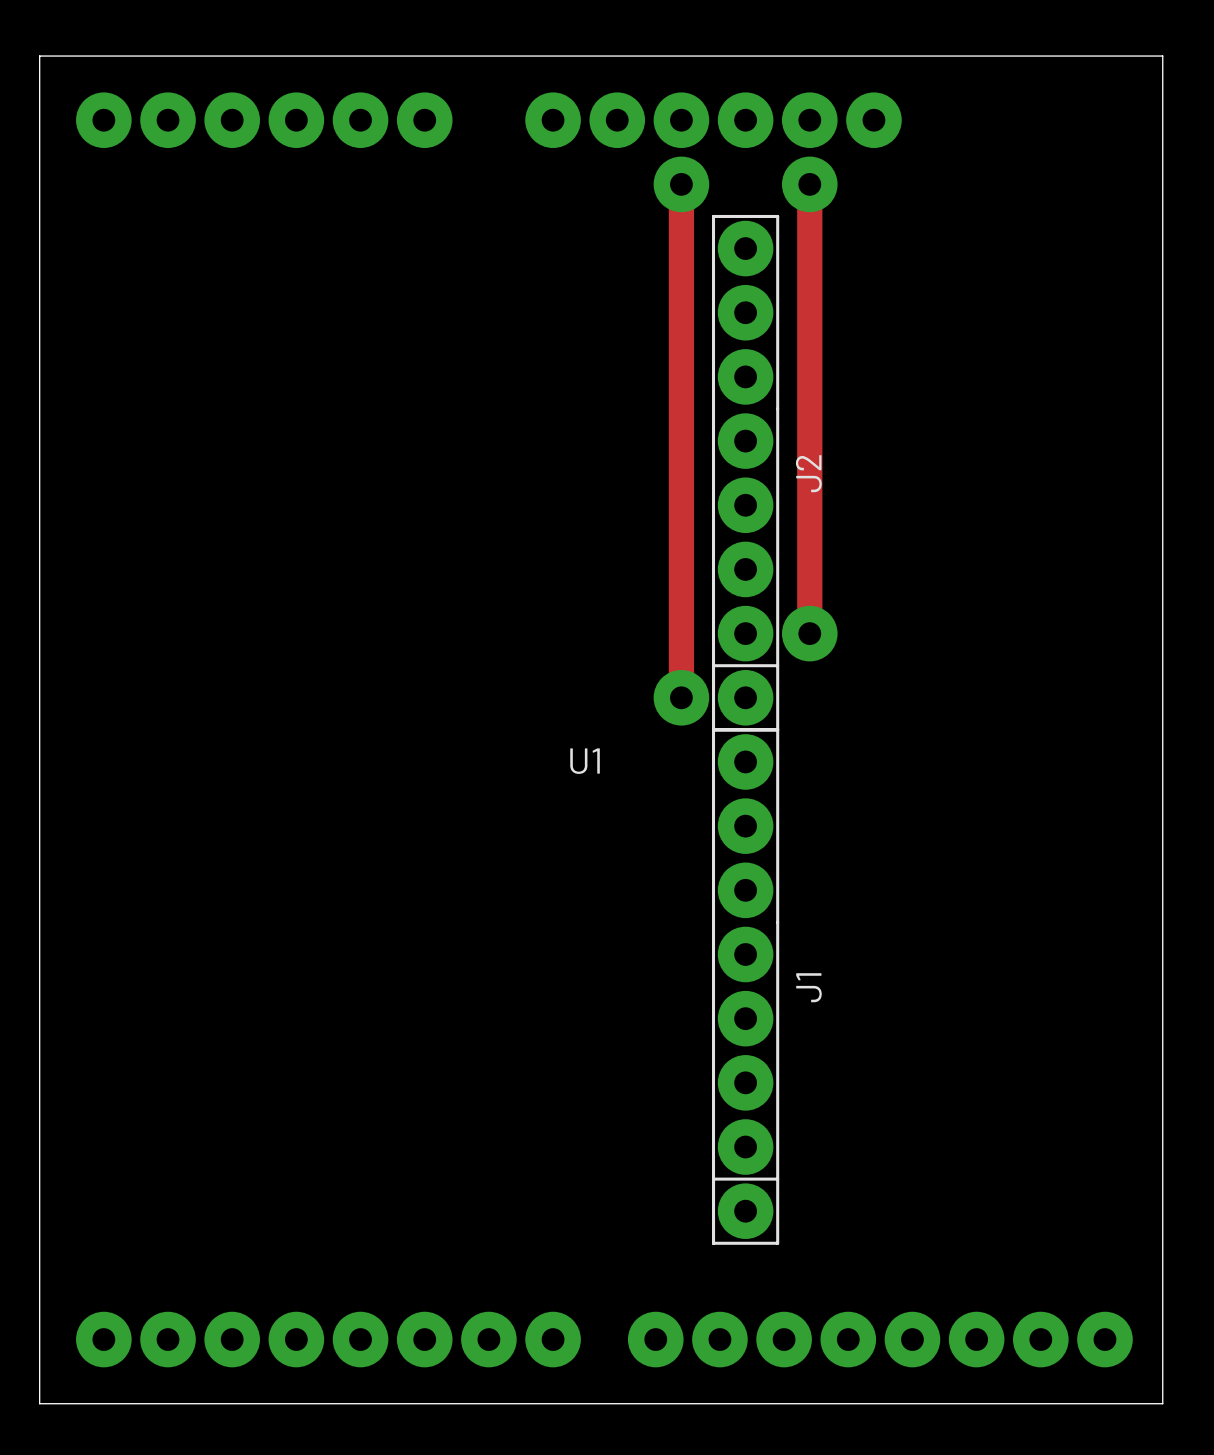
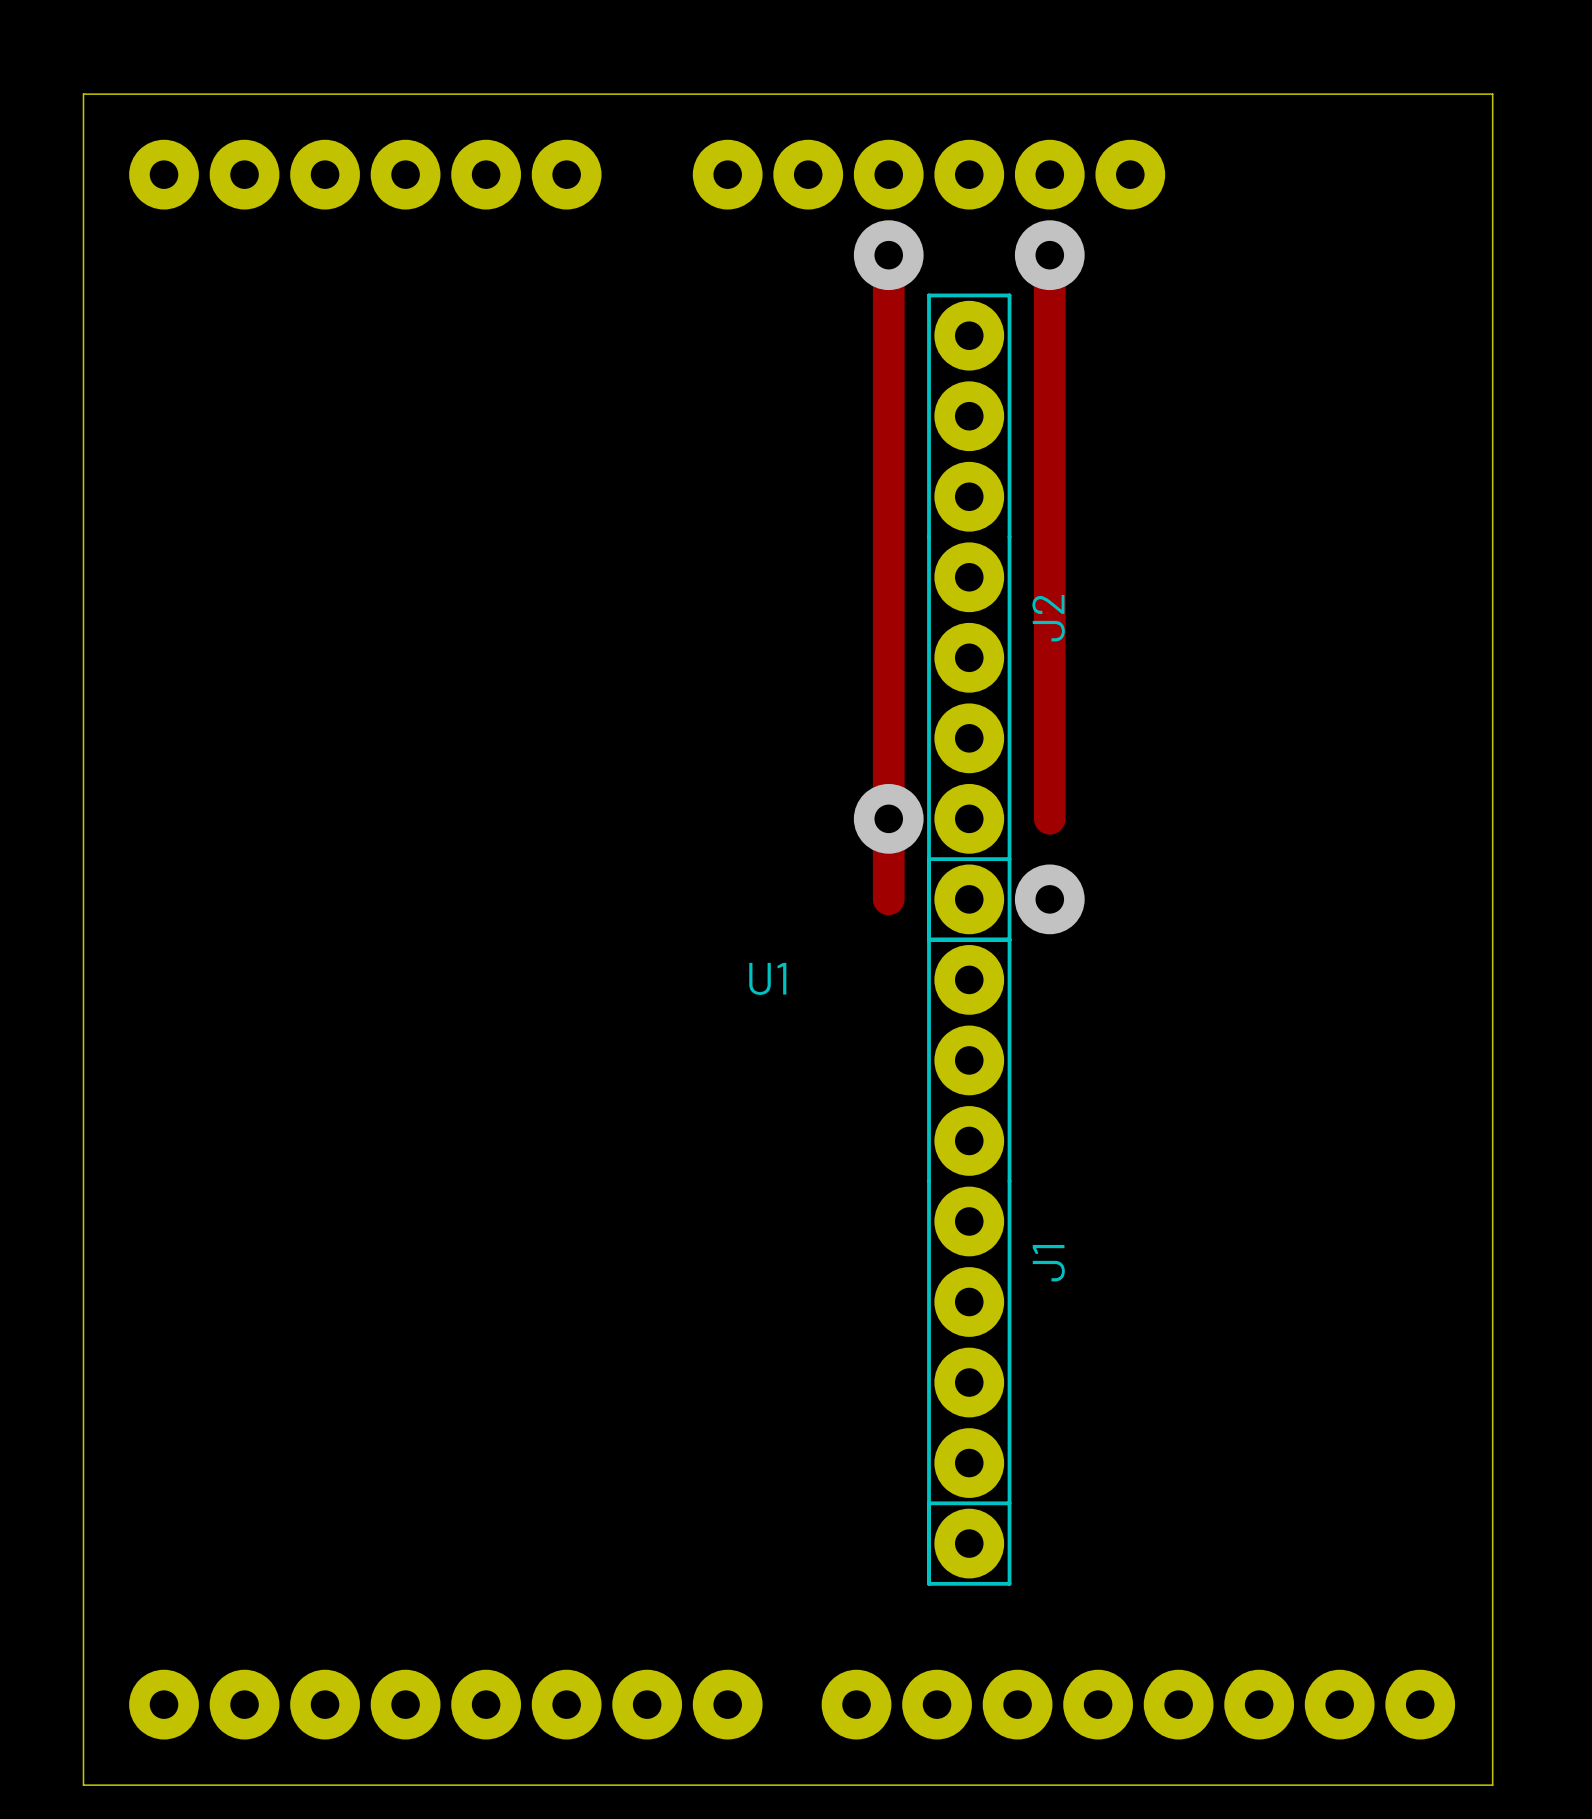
via: none -> (888, 818)
via: (809, 633) -> none
via: (681, 697) -> none
via: none -> (1049, 899)

